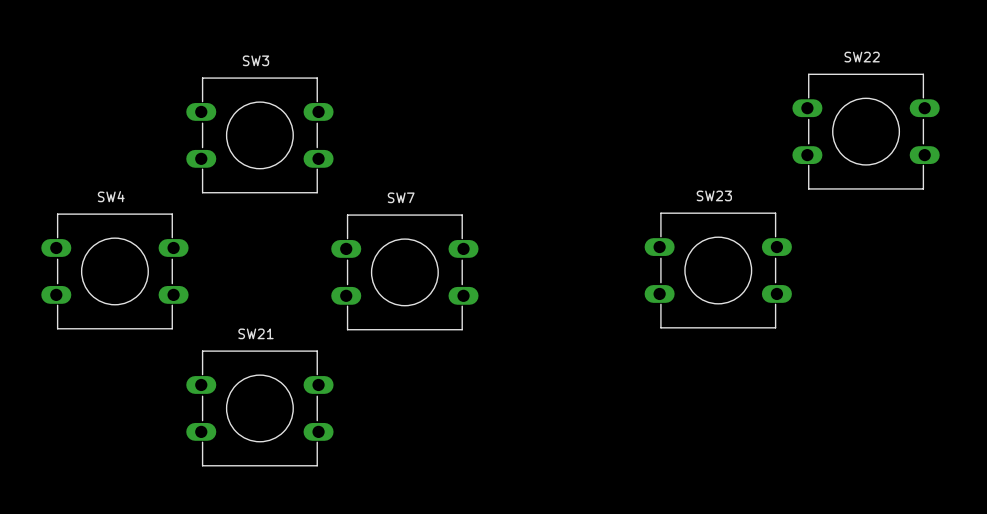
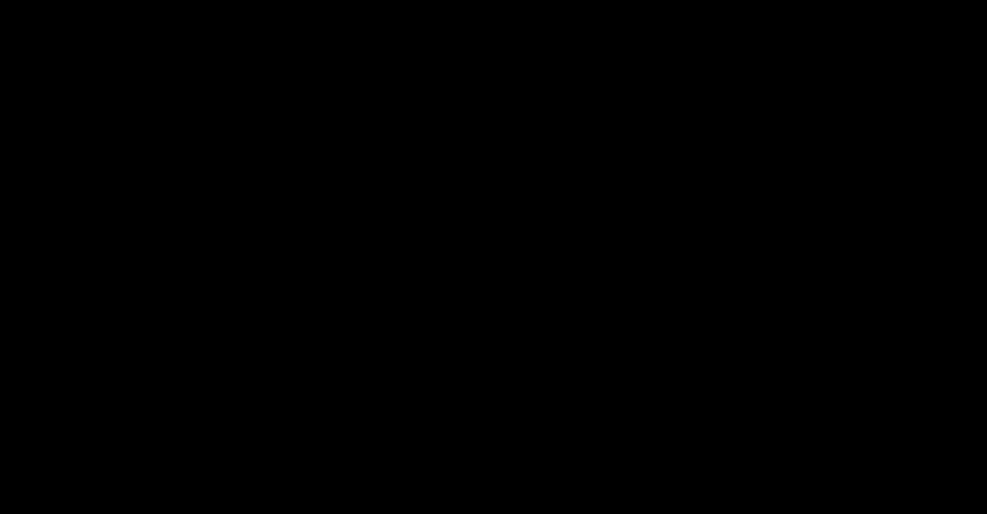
SW22: (866, 131) -> none
SW3: (259, 135) -> none
SW23: (718, 270) -> none
SW4: (114, 271) -> none
SW7: (404, 272) -> none
SW21: (259, 408) -> none

